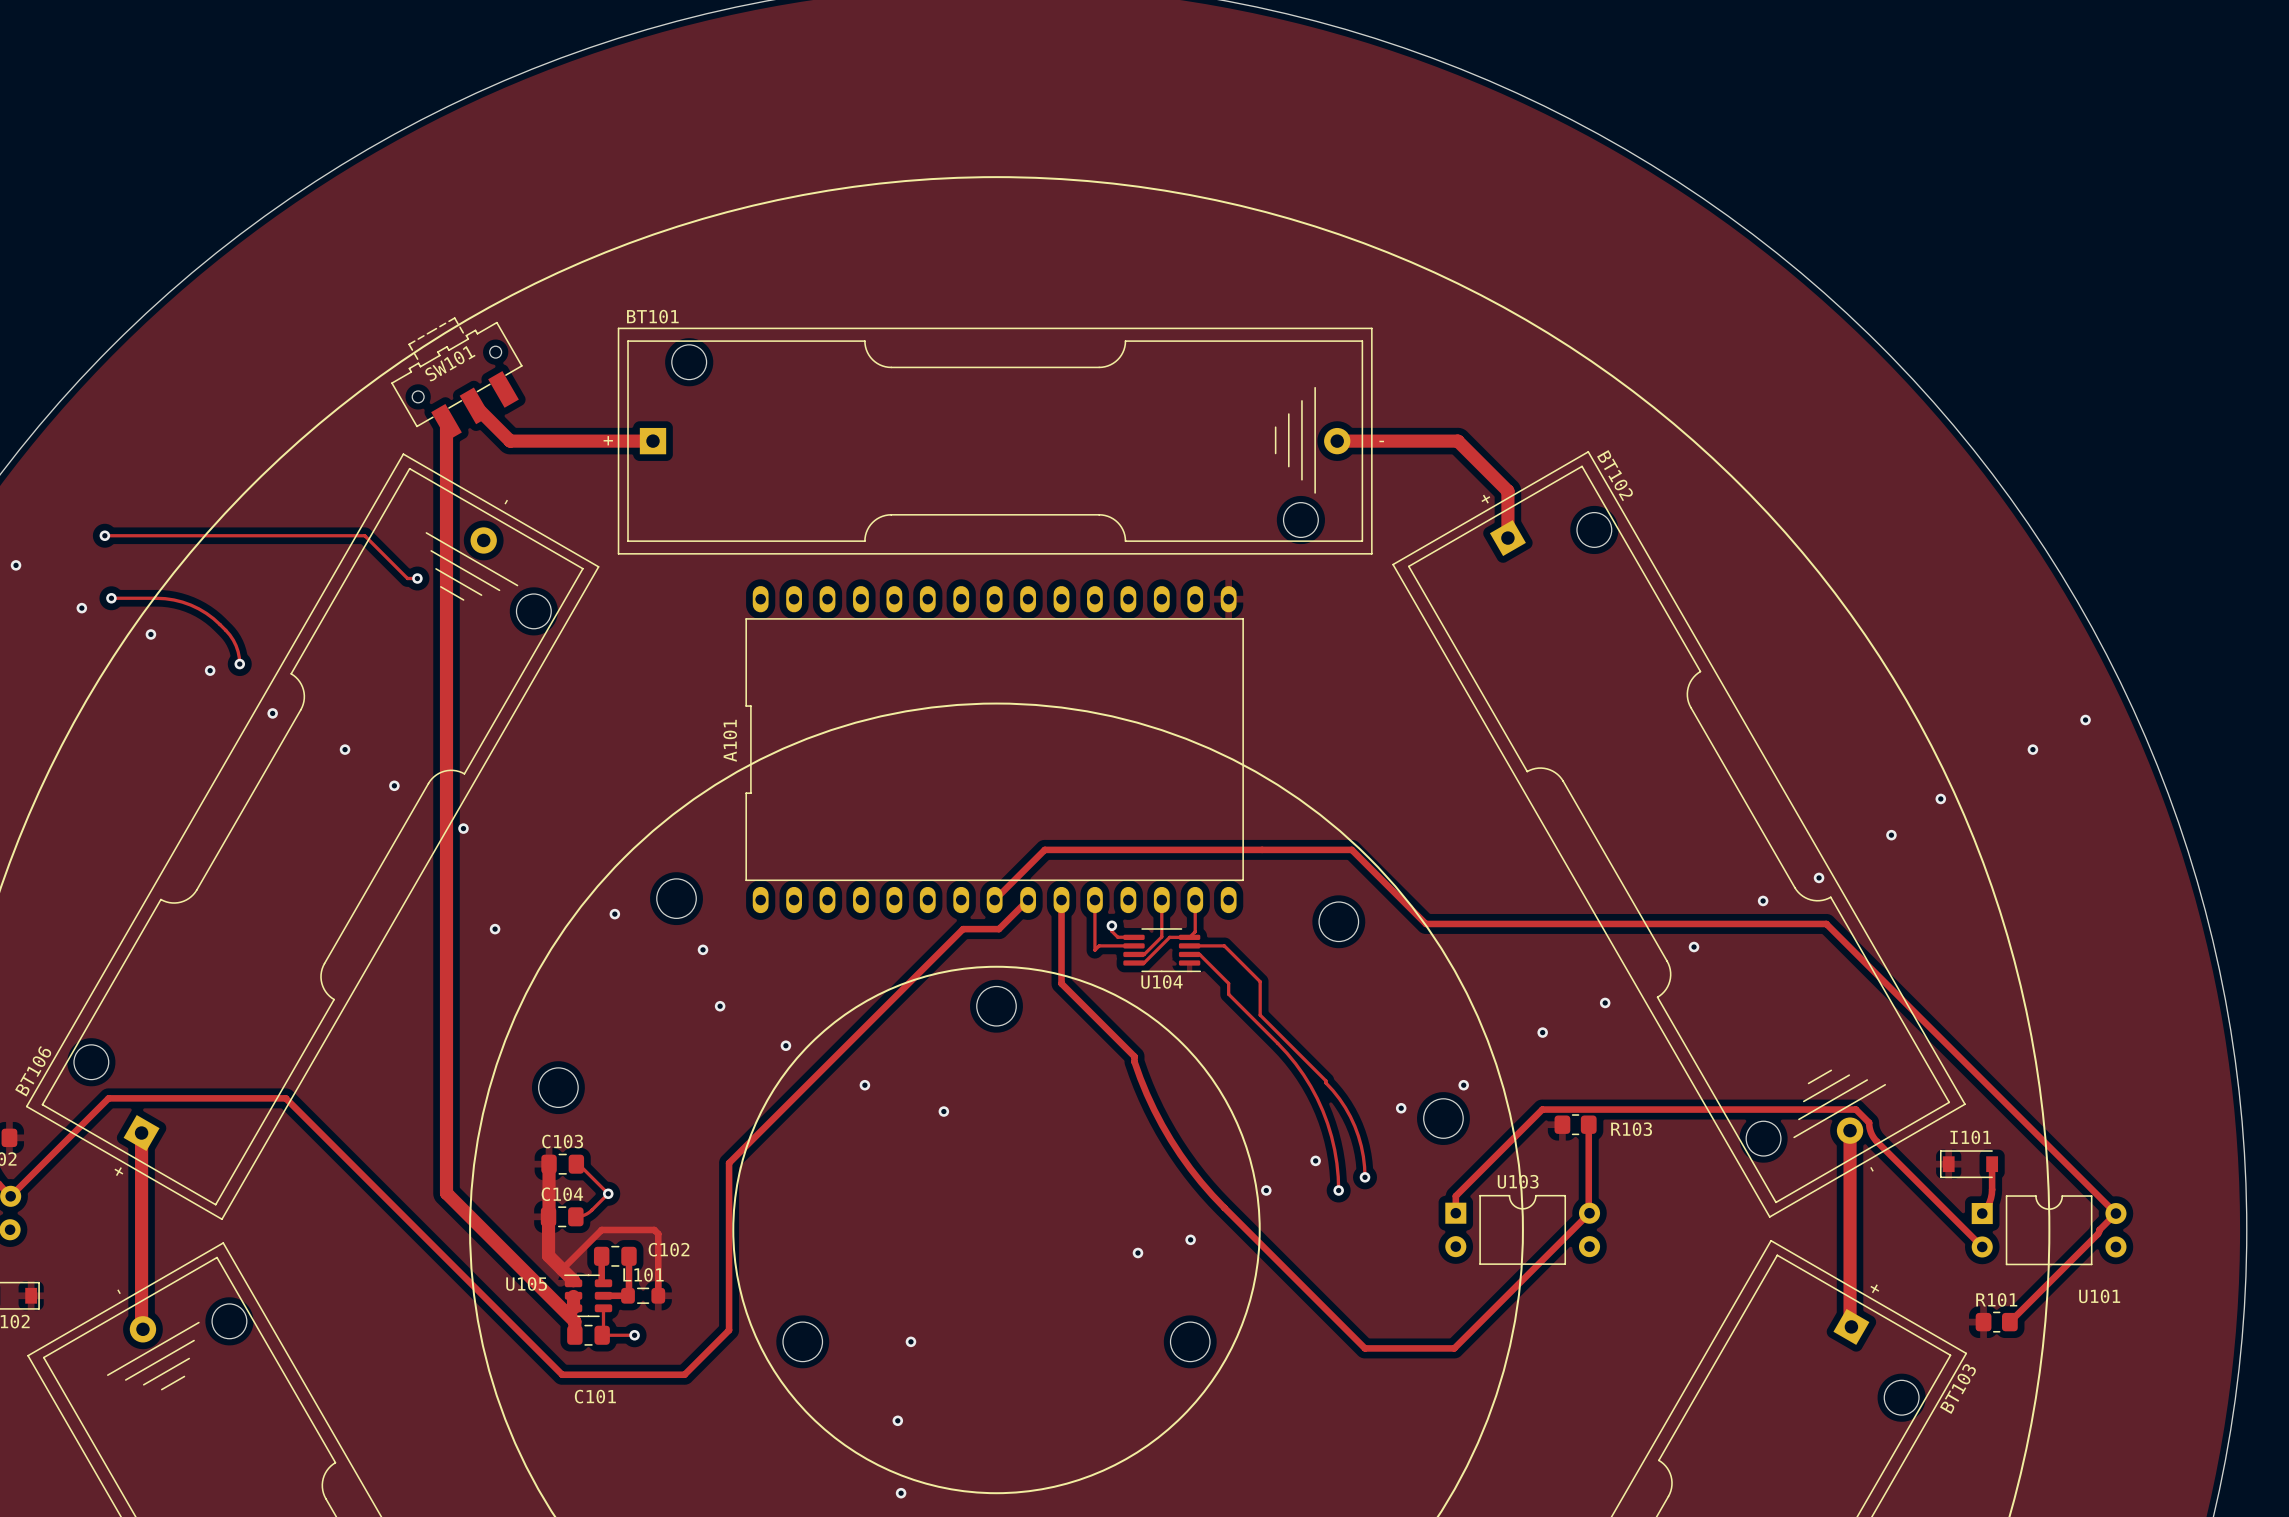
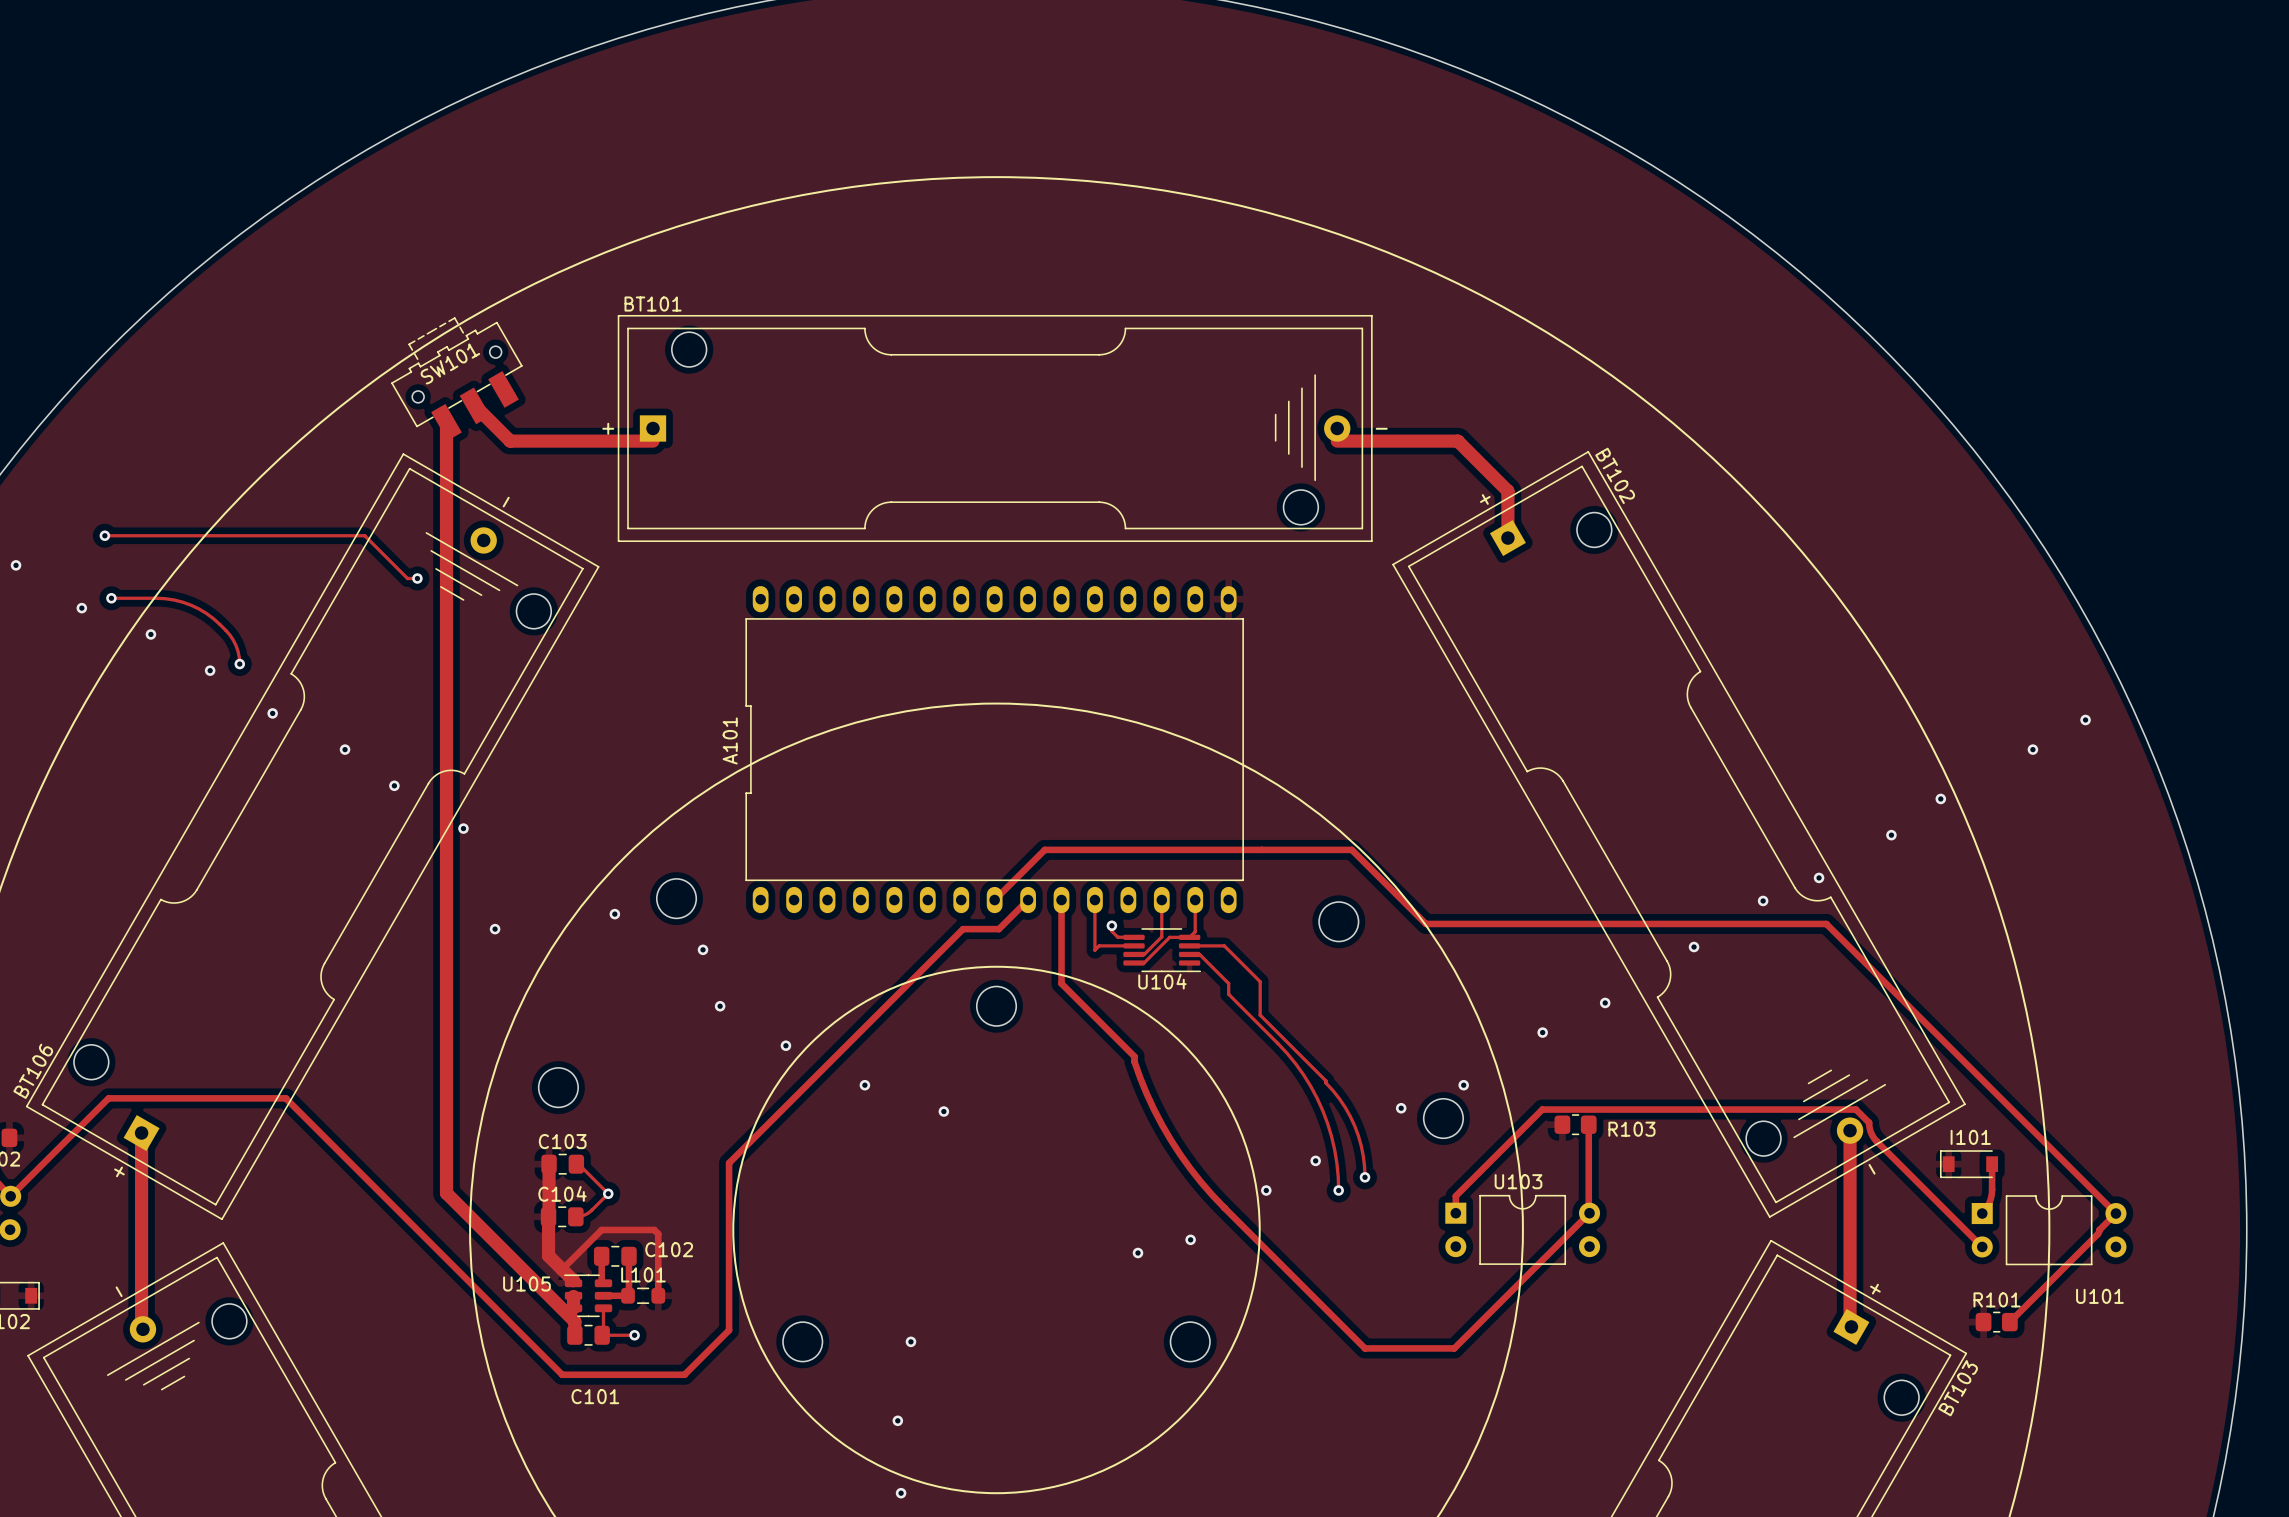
BT101 position: (995, 441) -> (995, 428)

